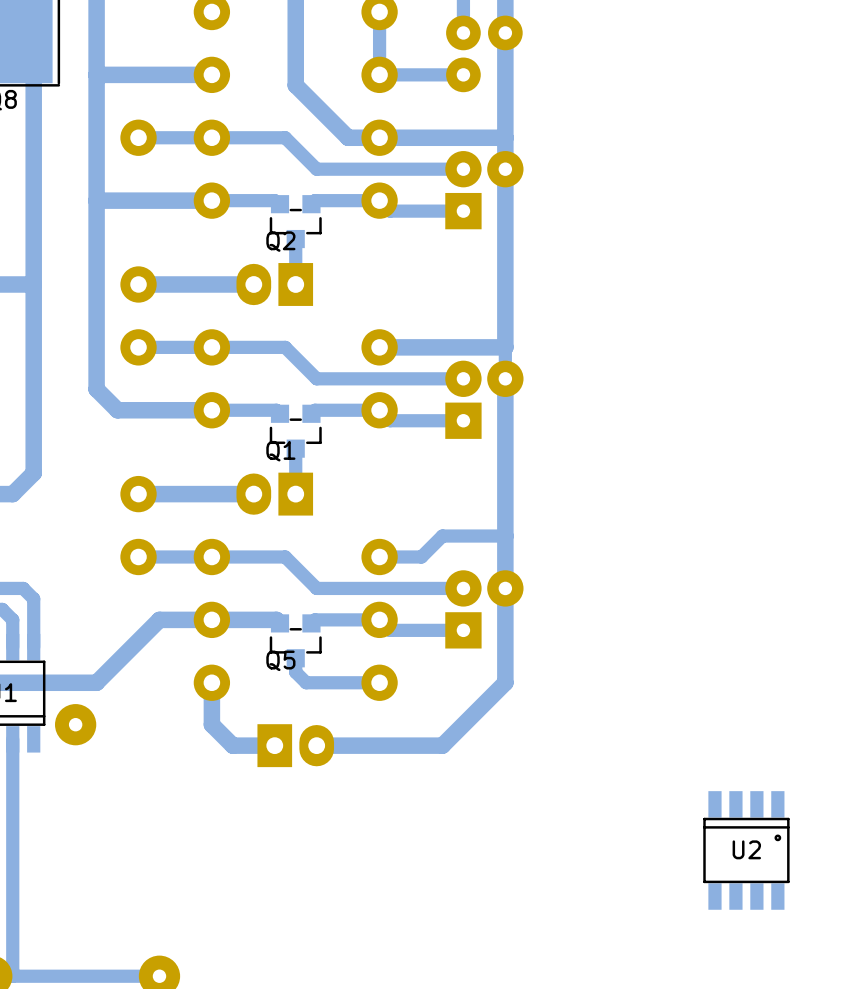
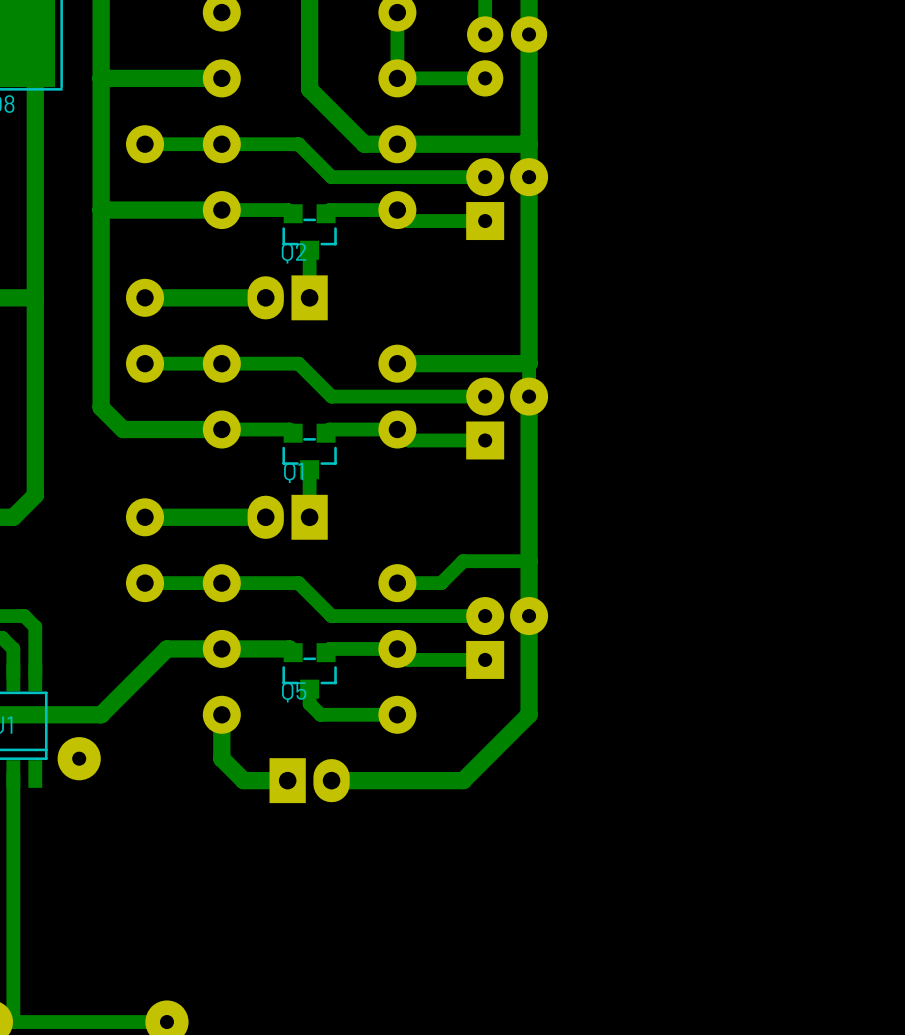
U2: (746, 850) -> none

